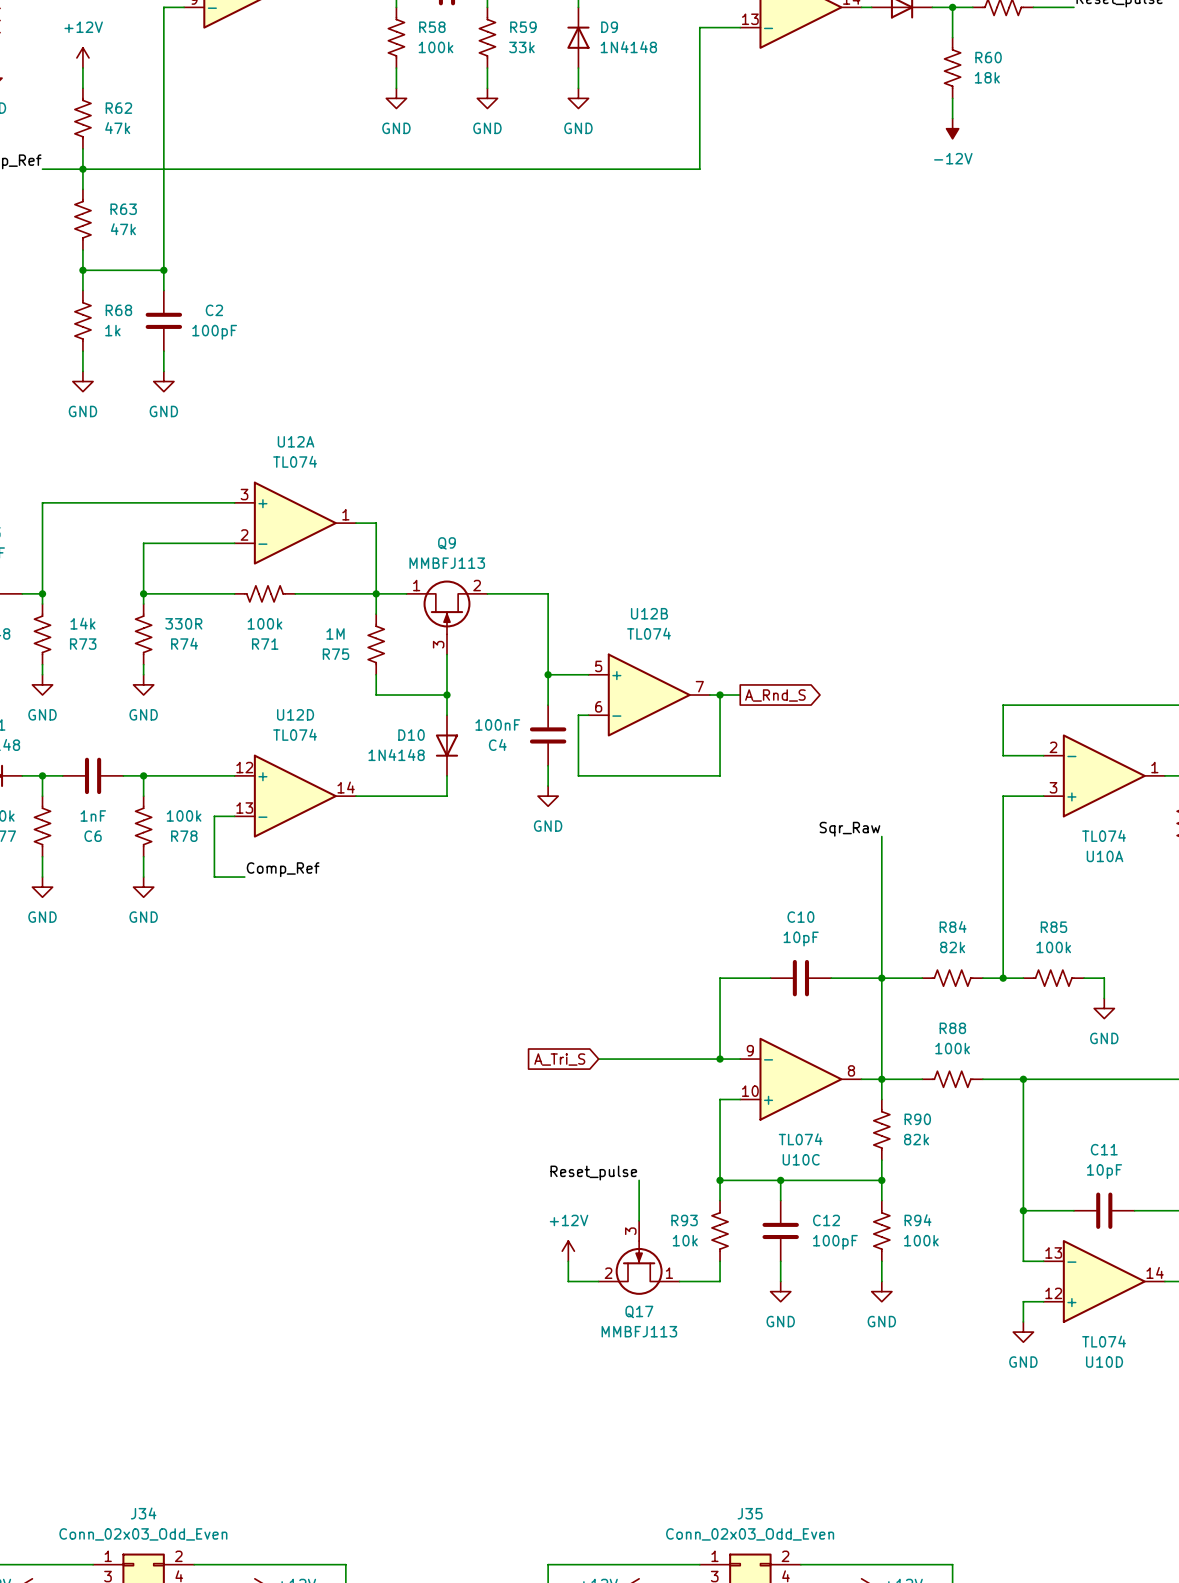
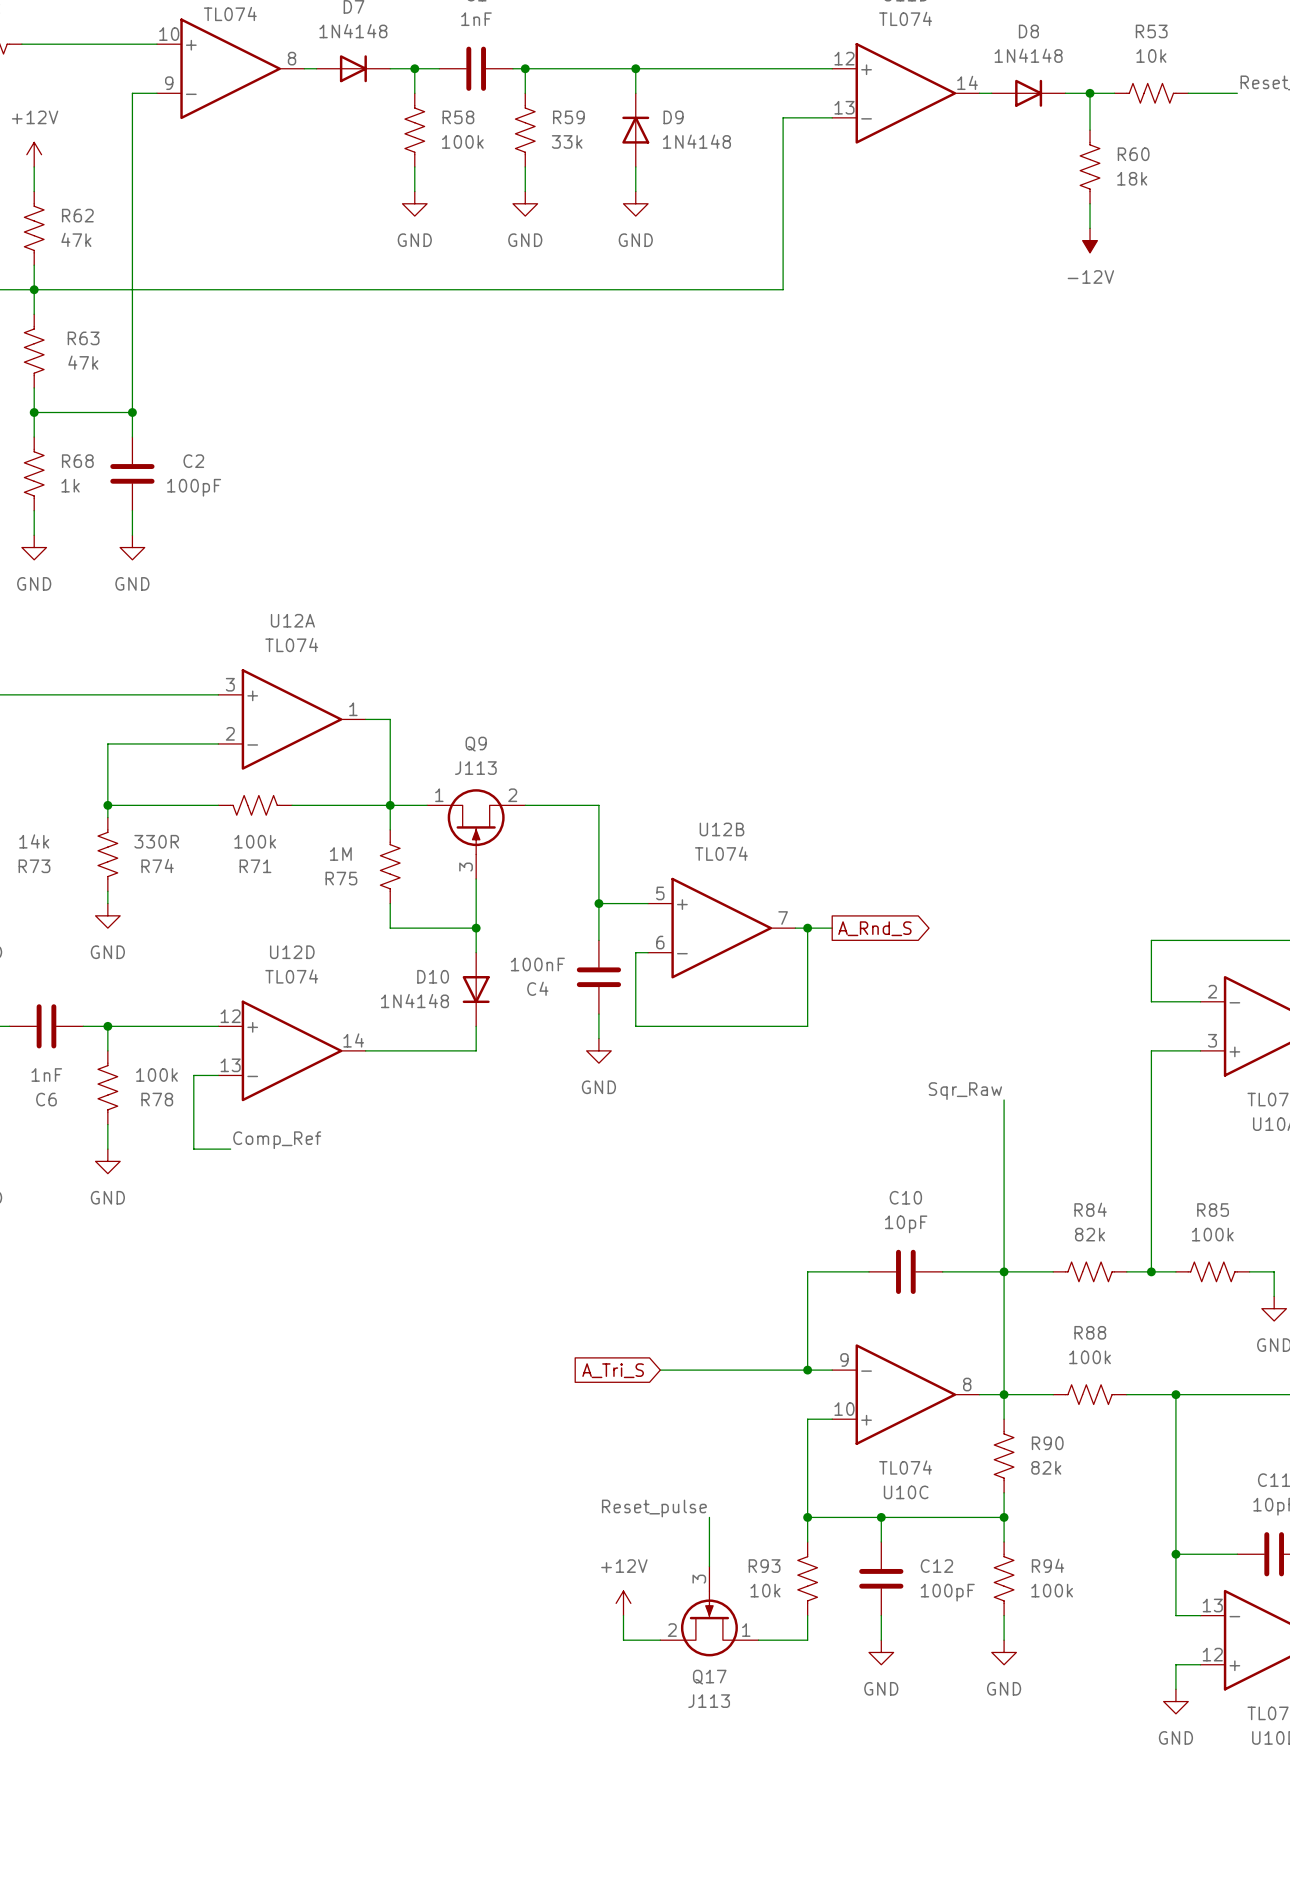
Q9 value: MMBFJ113 (447, 563) -> J113 (475, 768)
Q17 value: MMBFJ113 (639, 1331) -> J113 (709, 1701)

